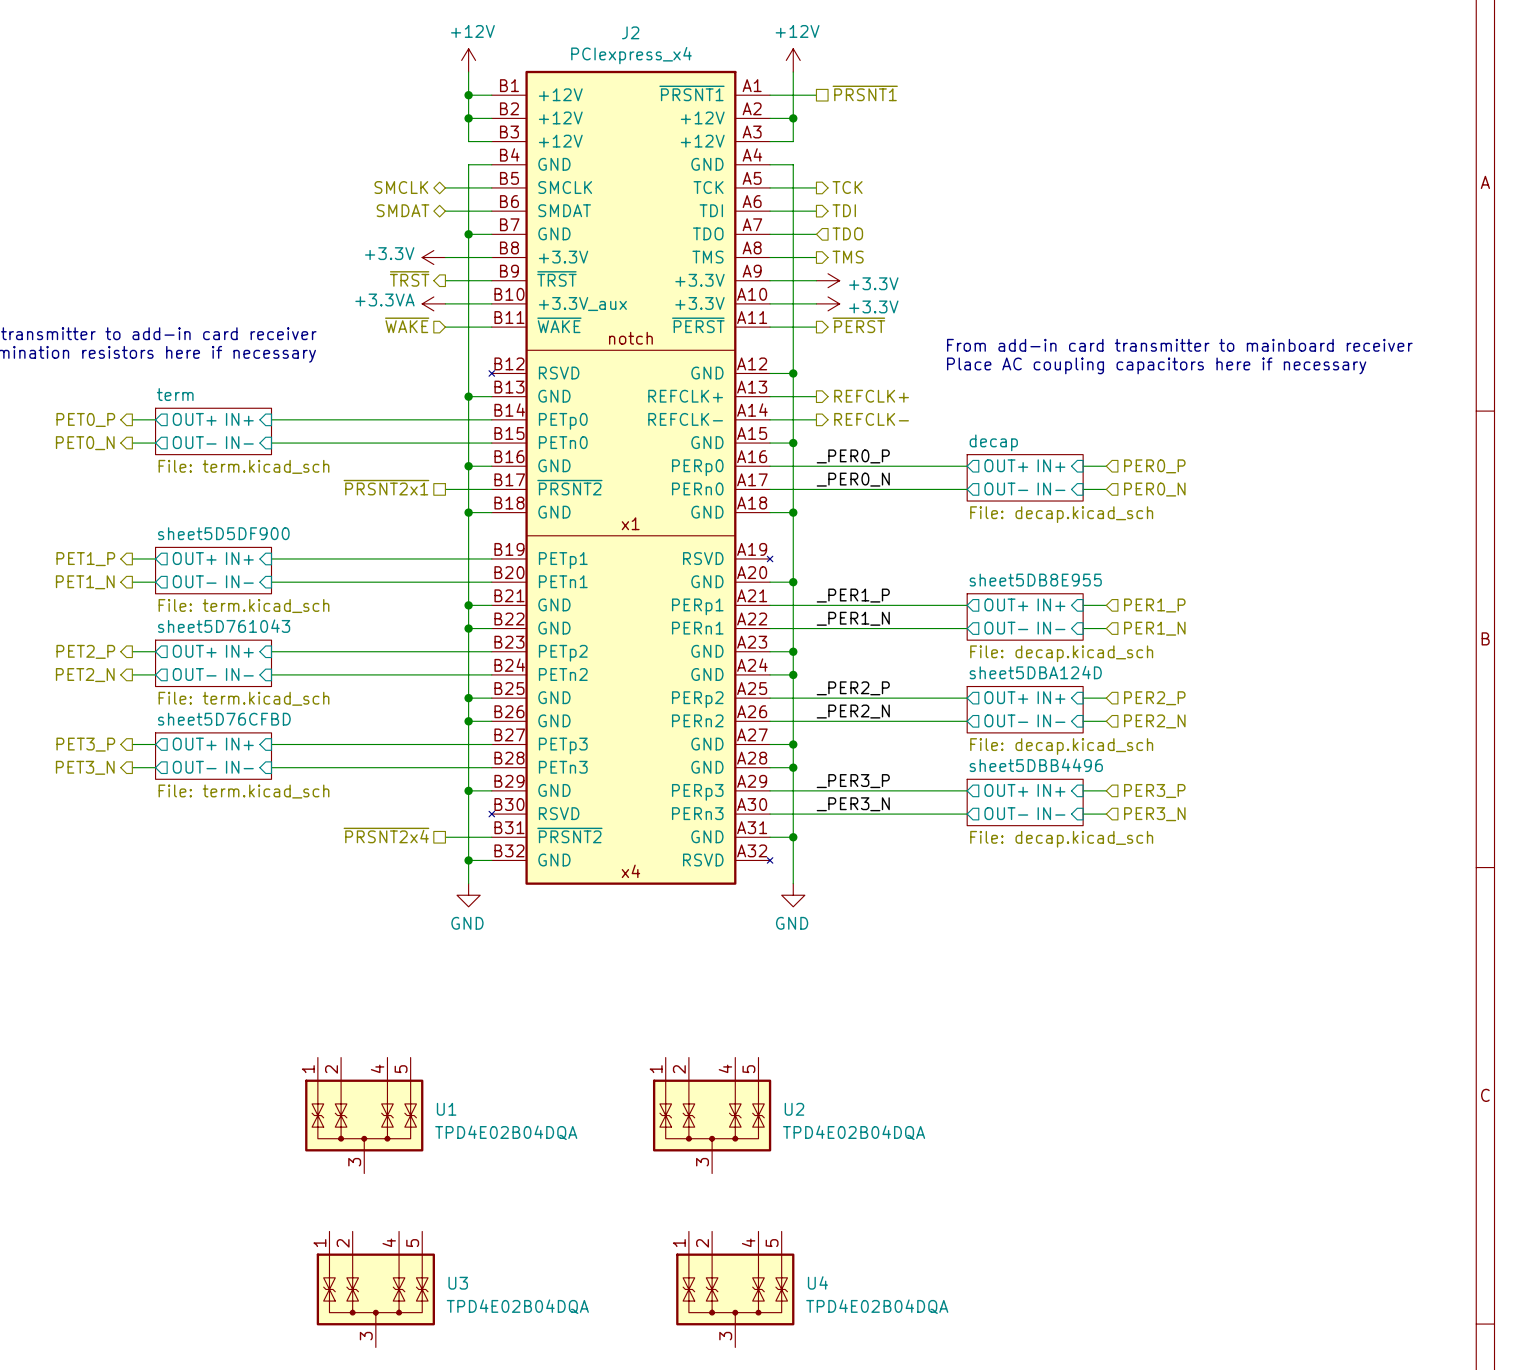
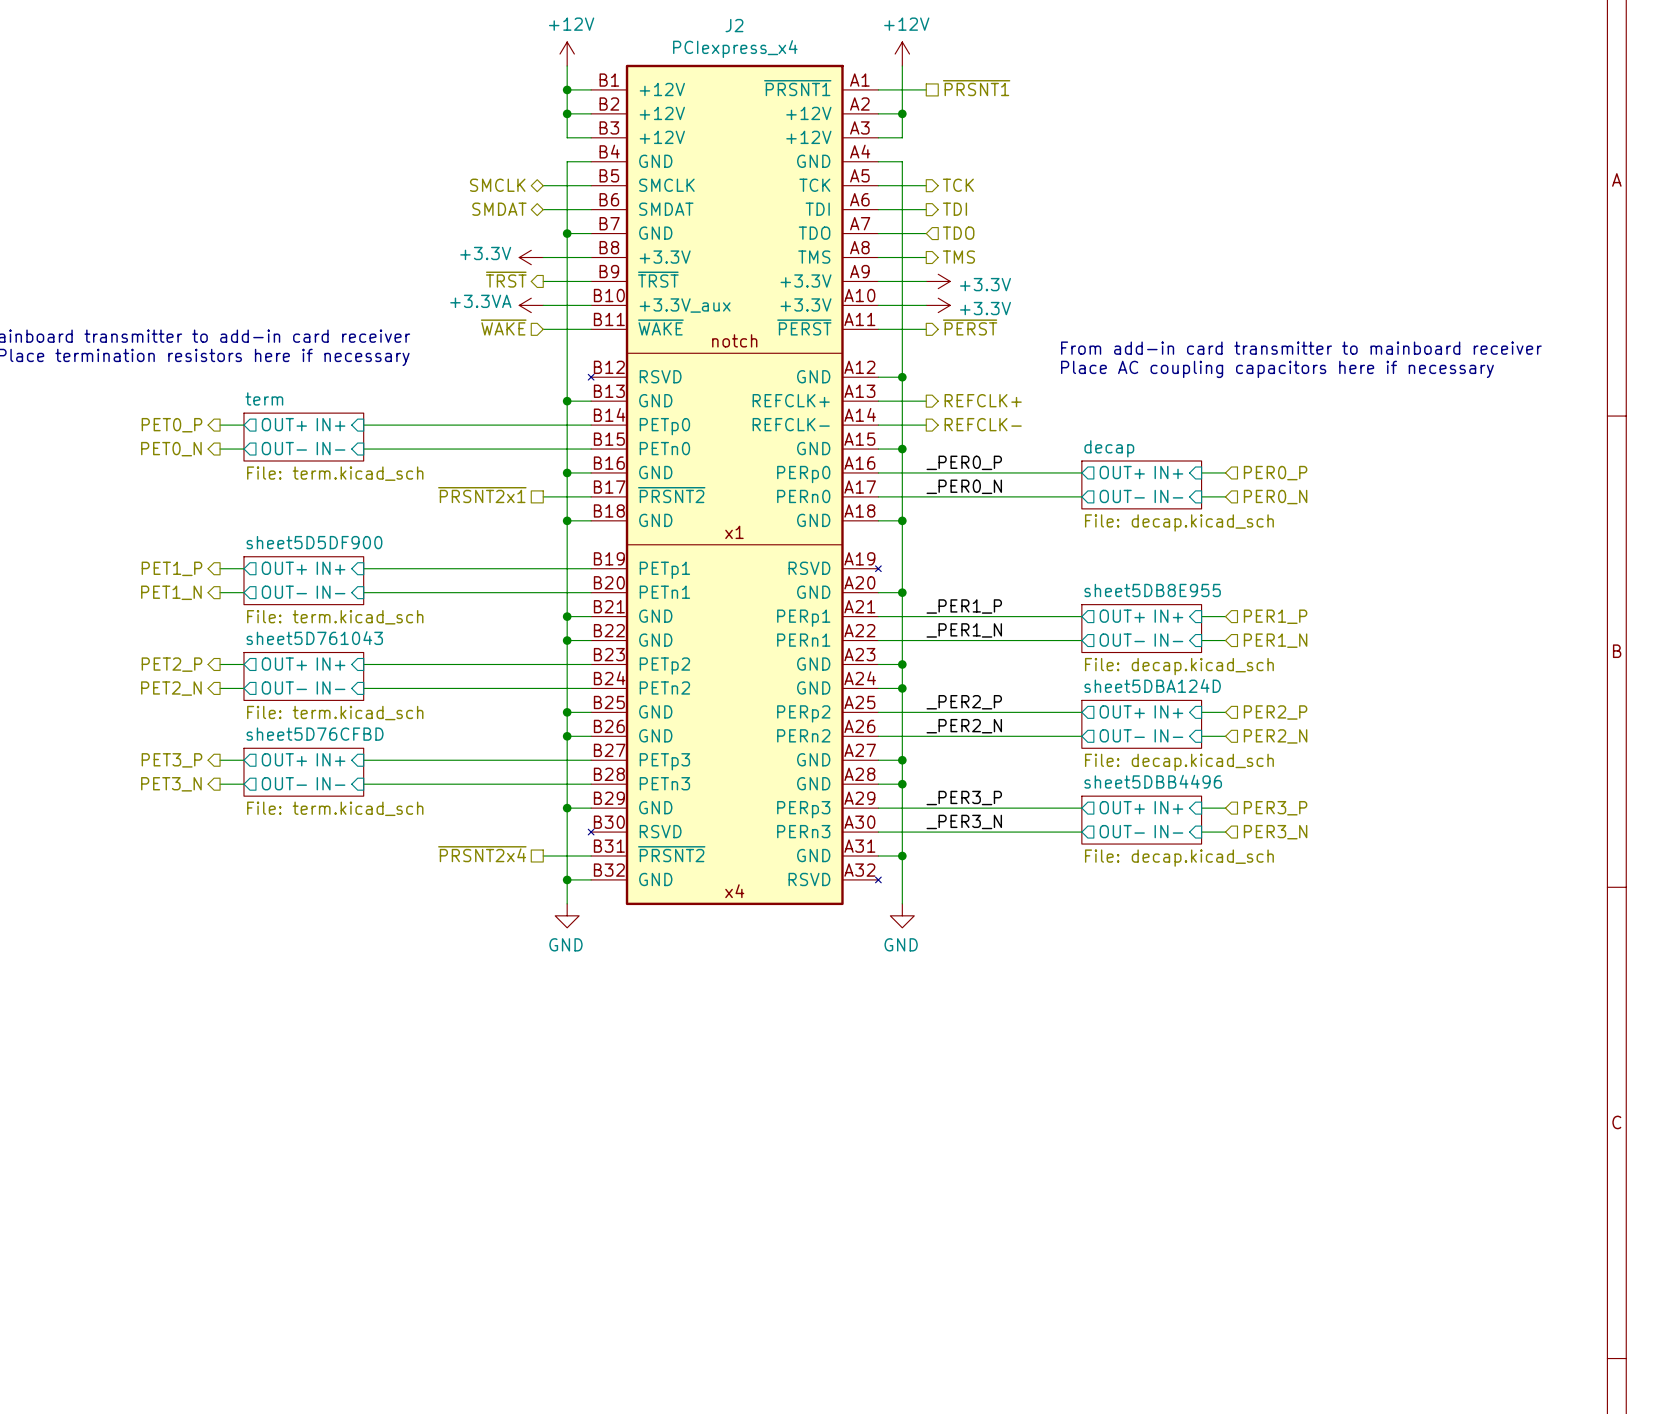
U1: TPD4E02B04DQA (364, 1115) -> none
U2: TPD4E02B04DQA (712, 1115) -> none
U3: TPD4E02B04DQA (375, 1289) -> none
U4: TPD4E02B04DQA (735, 1289) -> none

